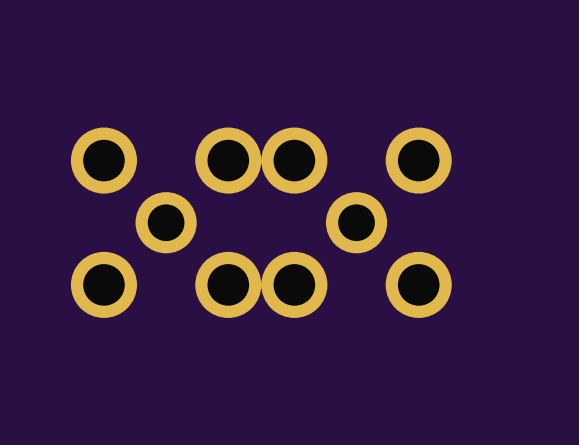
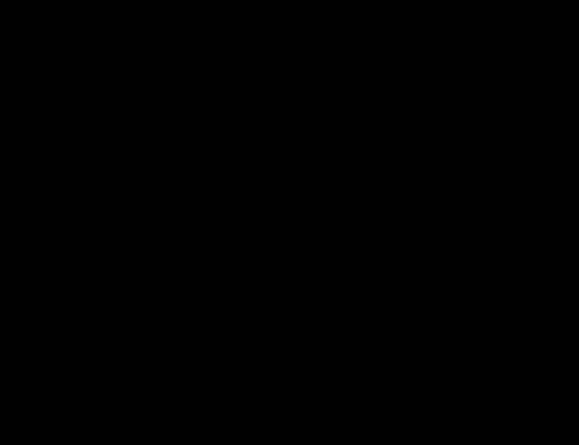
part: (166, 222) -> none
part: (356, 222) -> none

